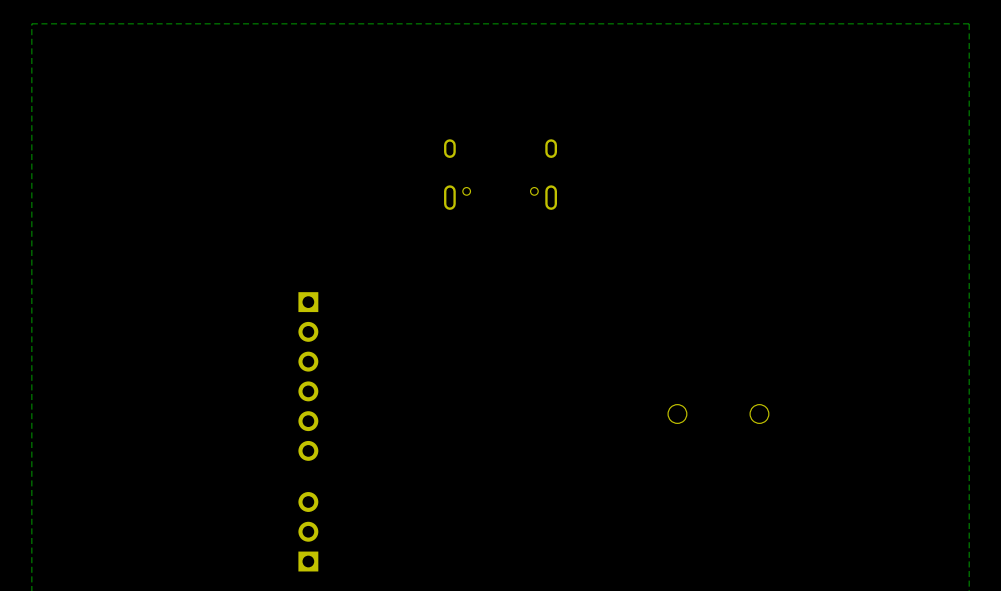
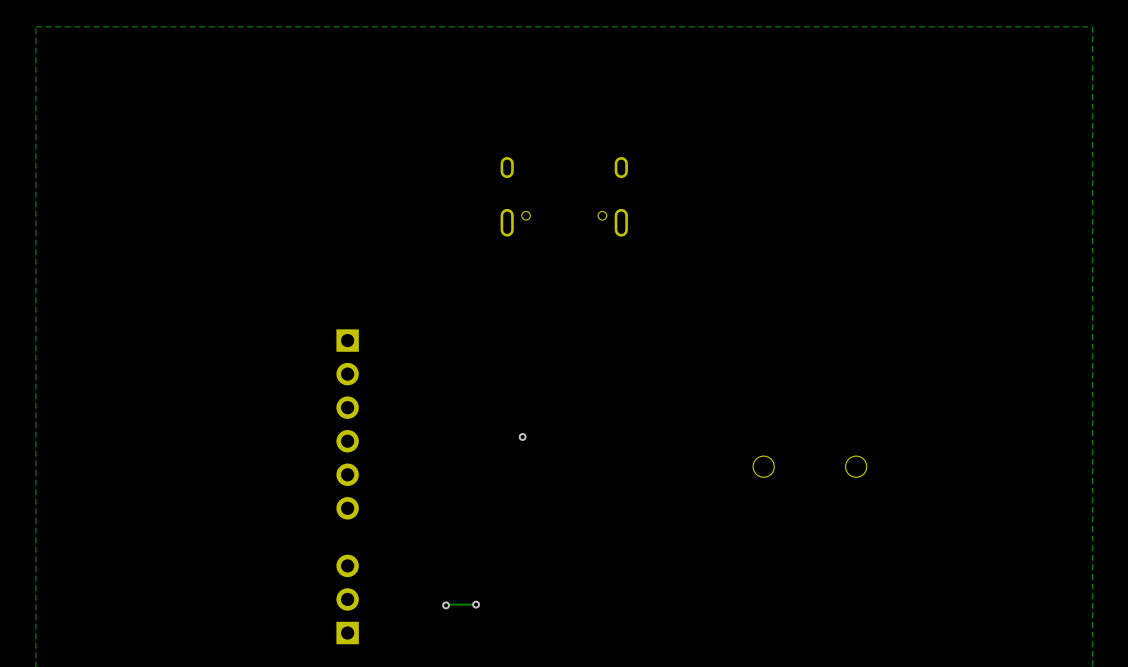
via: none -> (522, 436)
track: none -> (476, 604) (446, 605)
via: none -> (476, 604)
via: none -> (446, 605)

